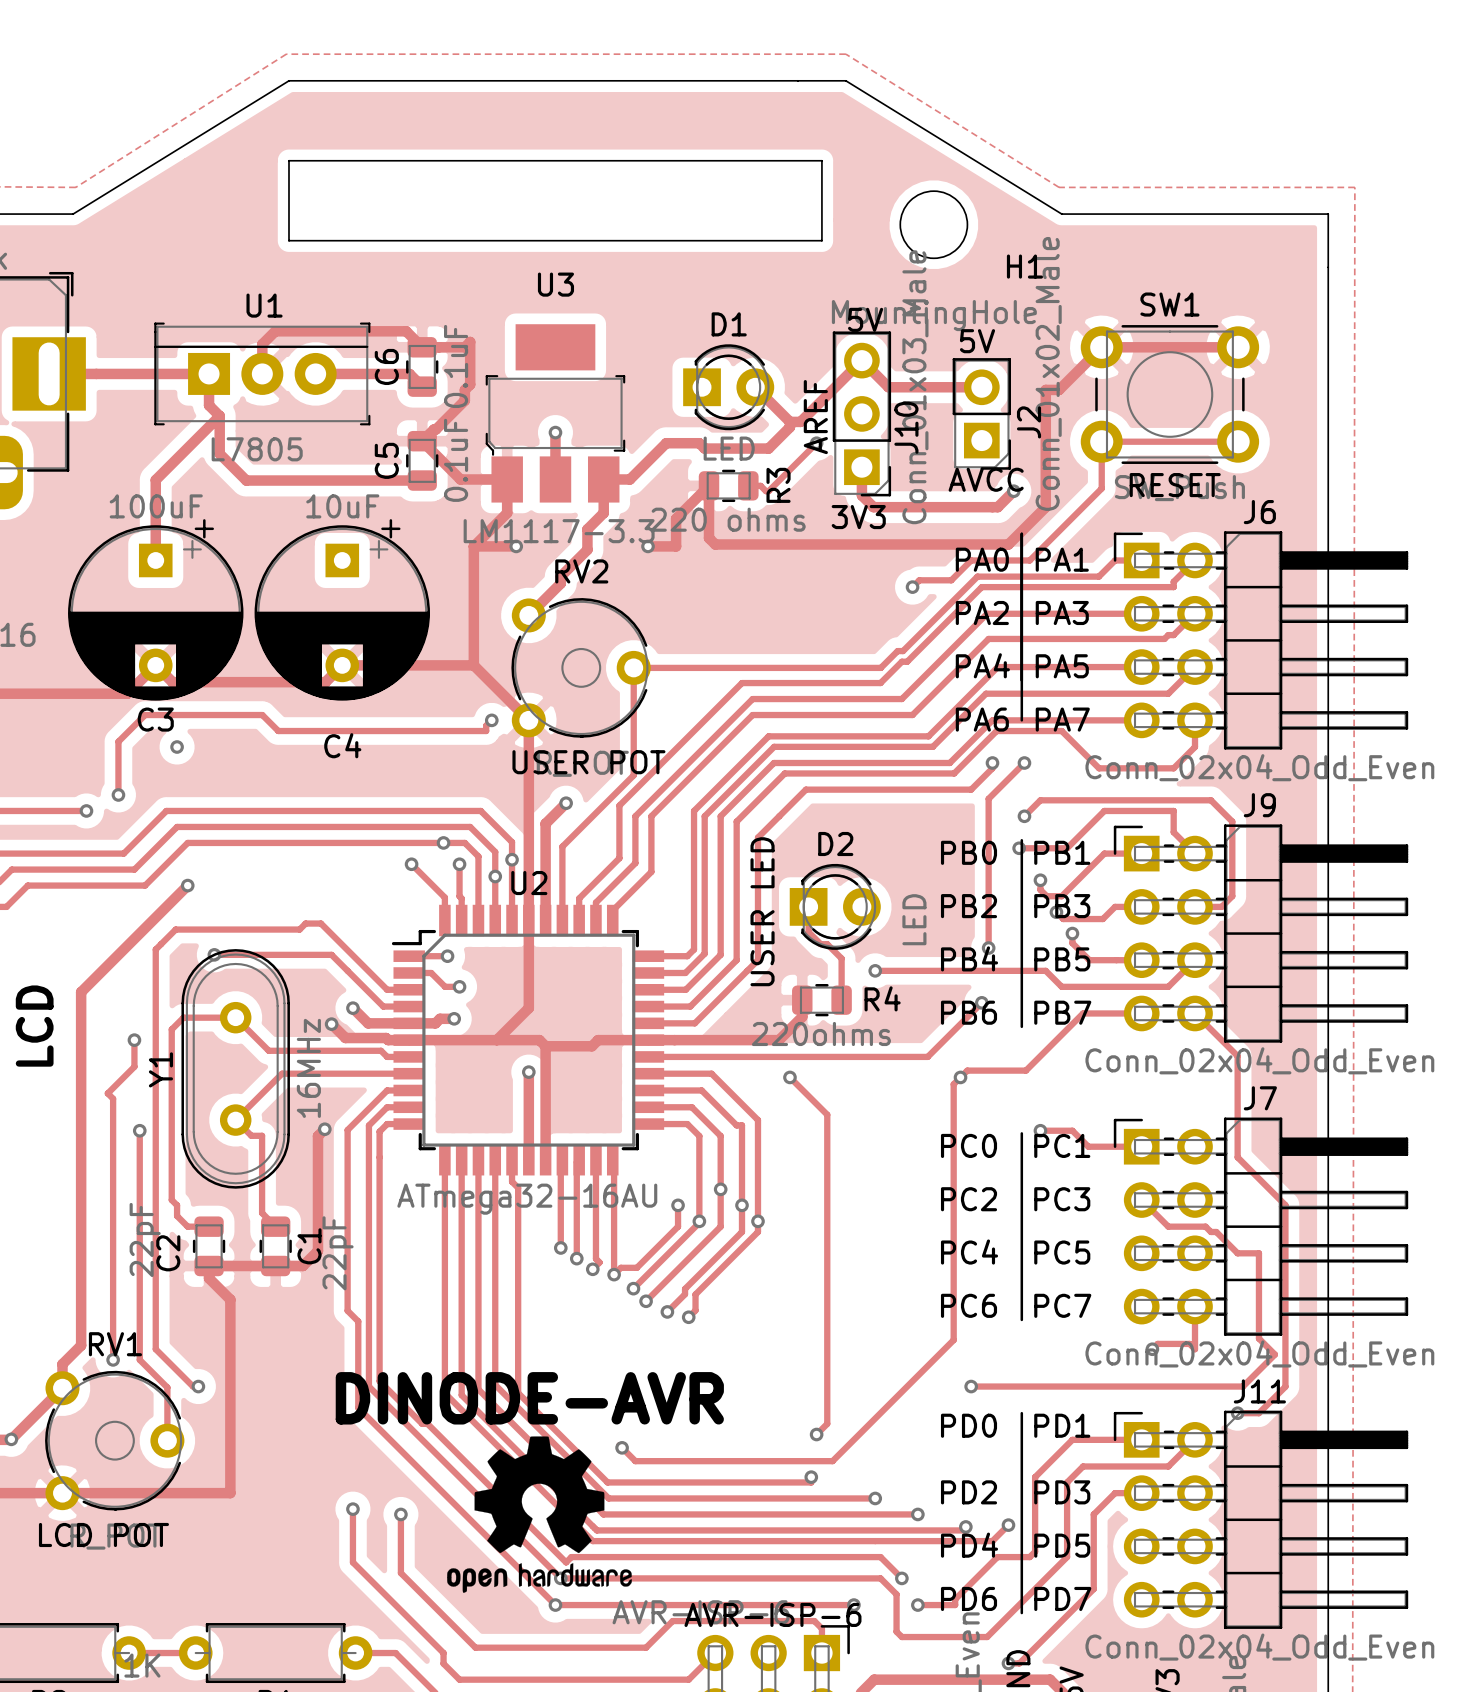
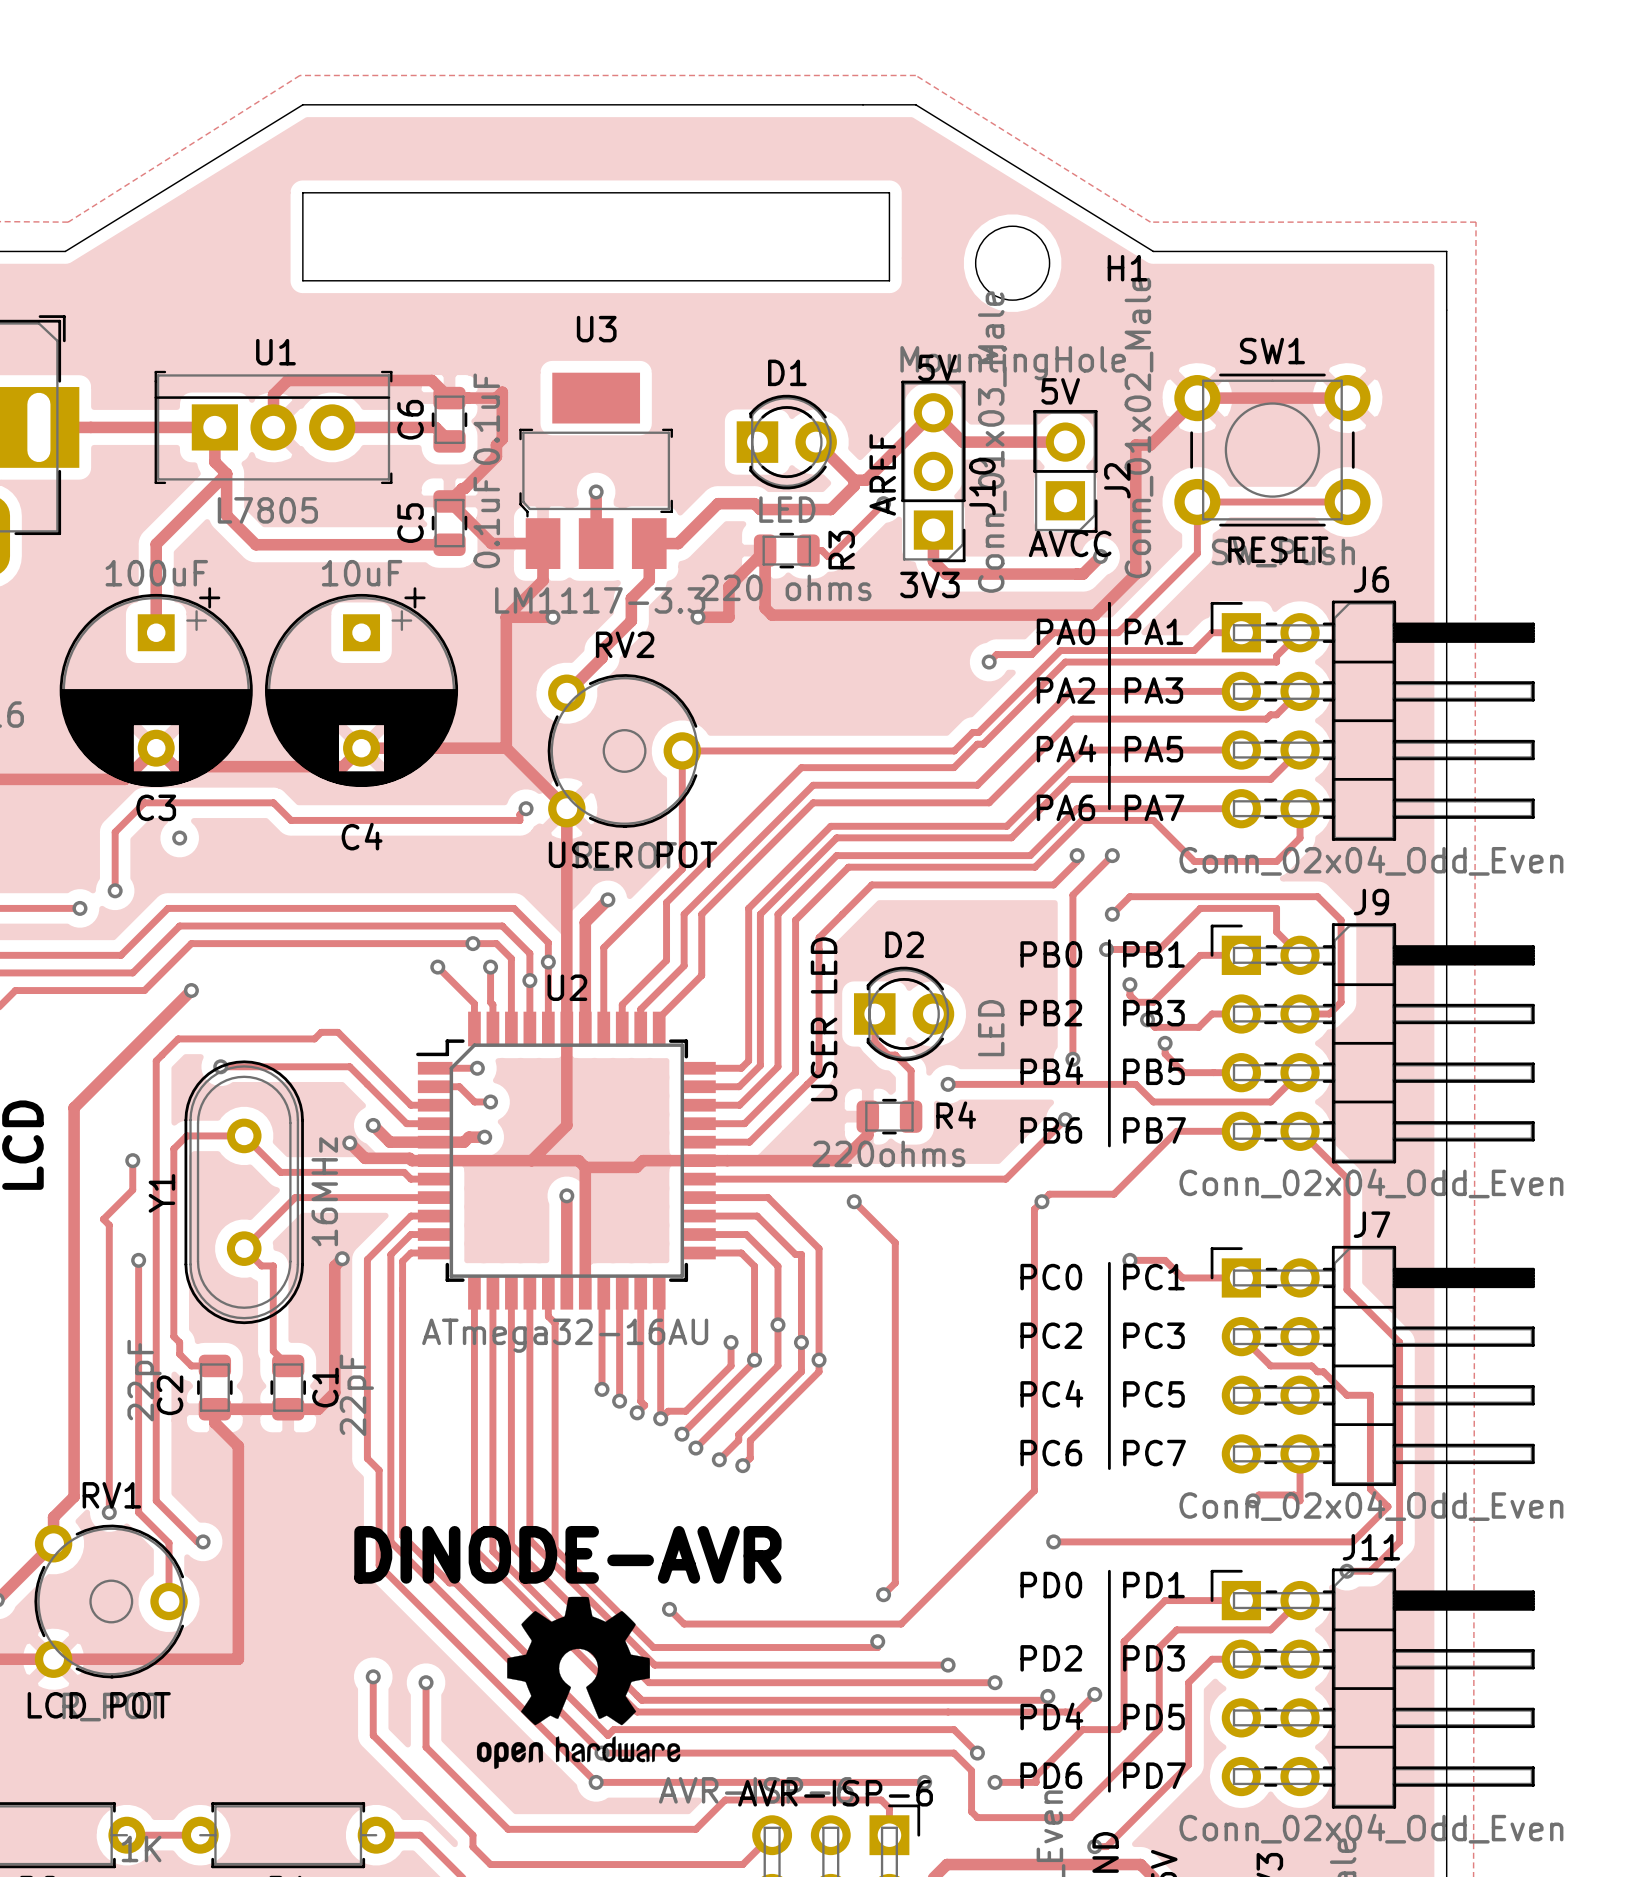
H1 name position: H1 (1024, 266) -> H1 (1127, 268)

